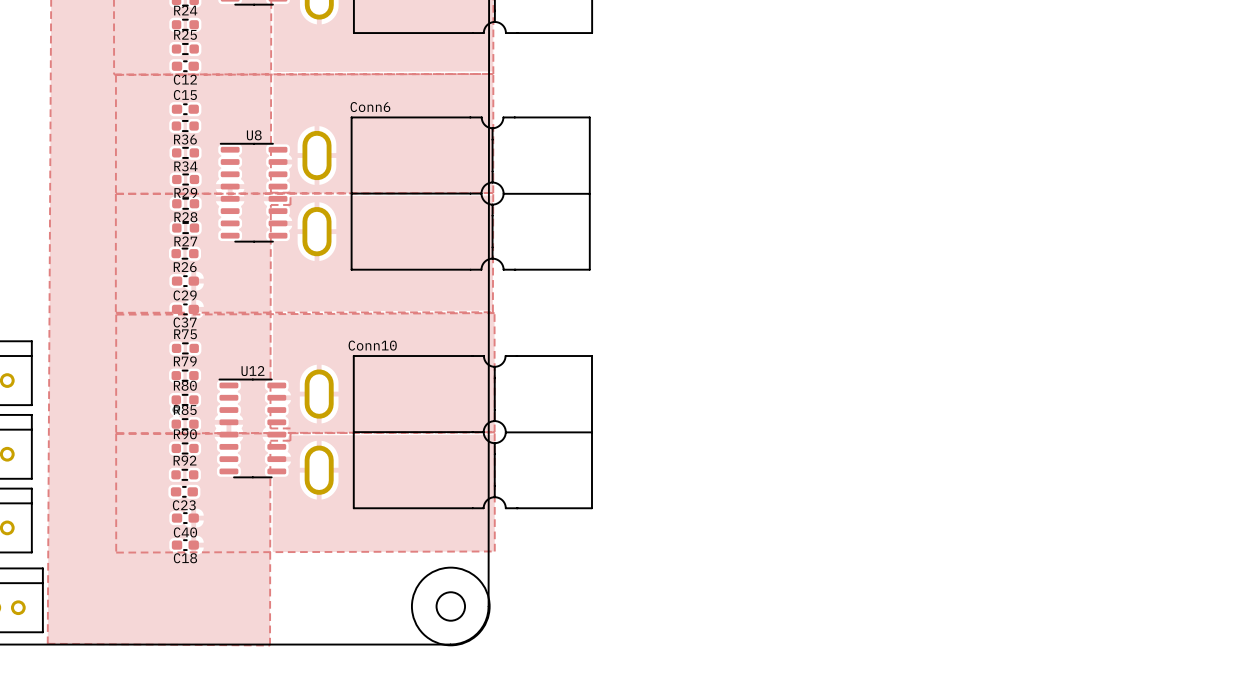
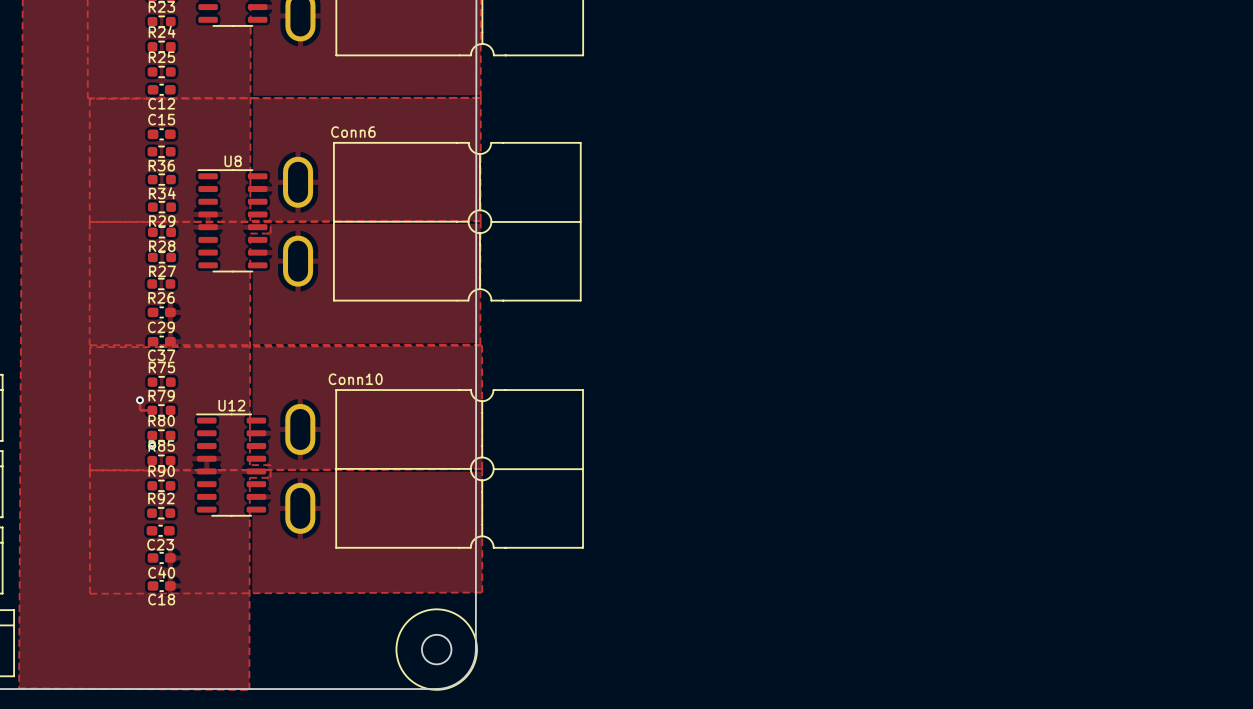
track: none -> (140, 400) (141, 410) (152, 410)
via: none -> (140, 400)

